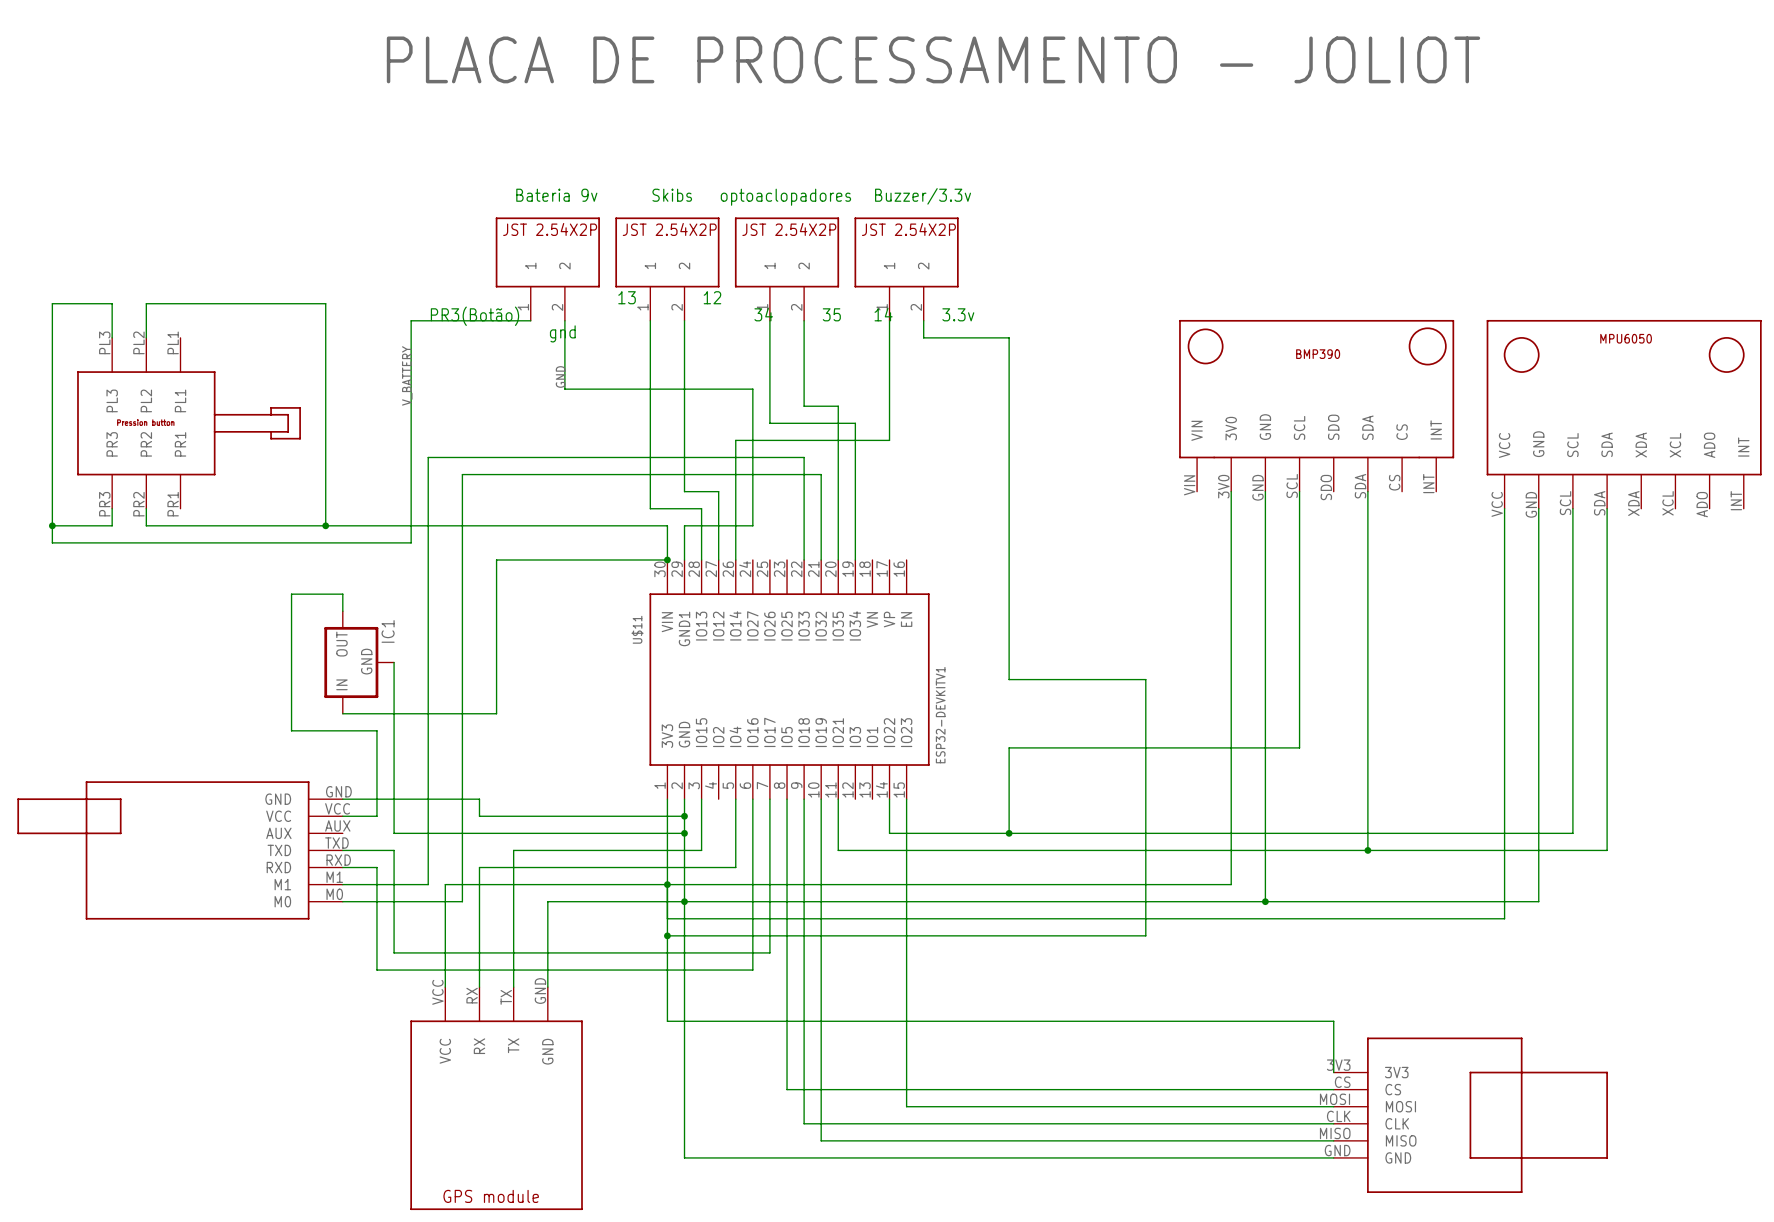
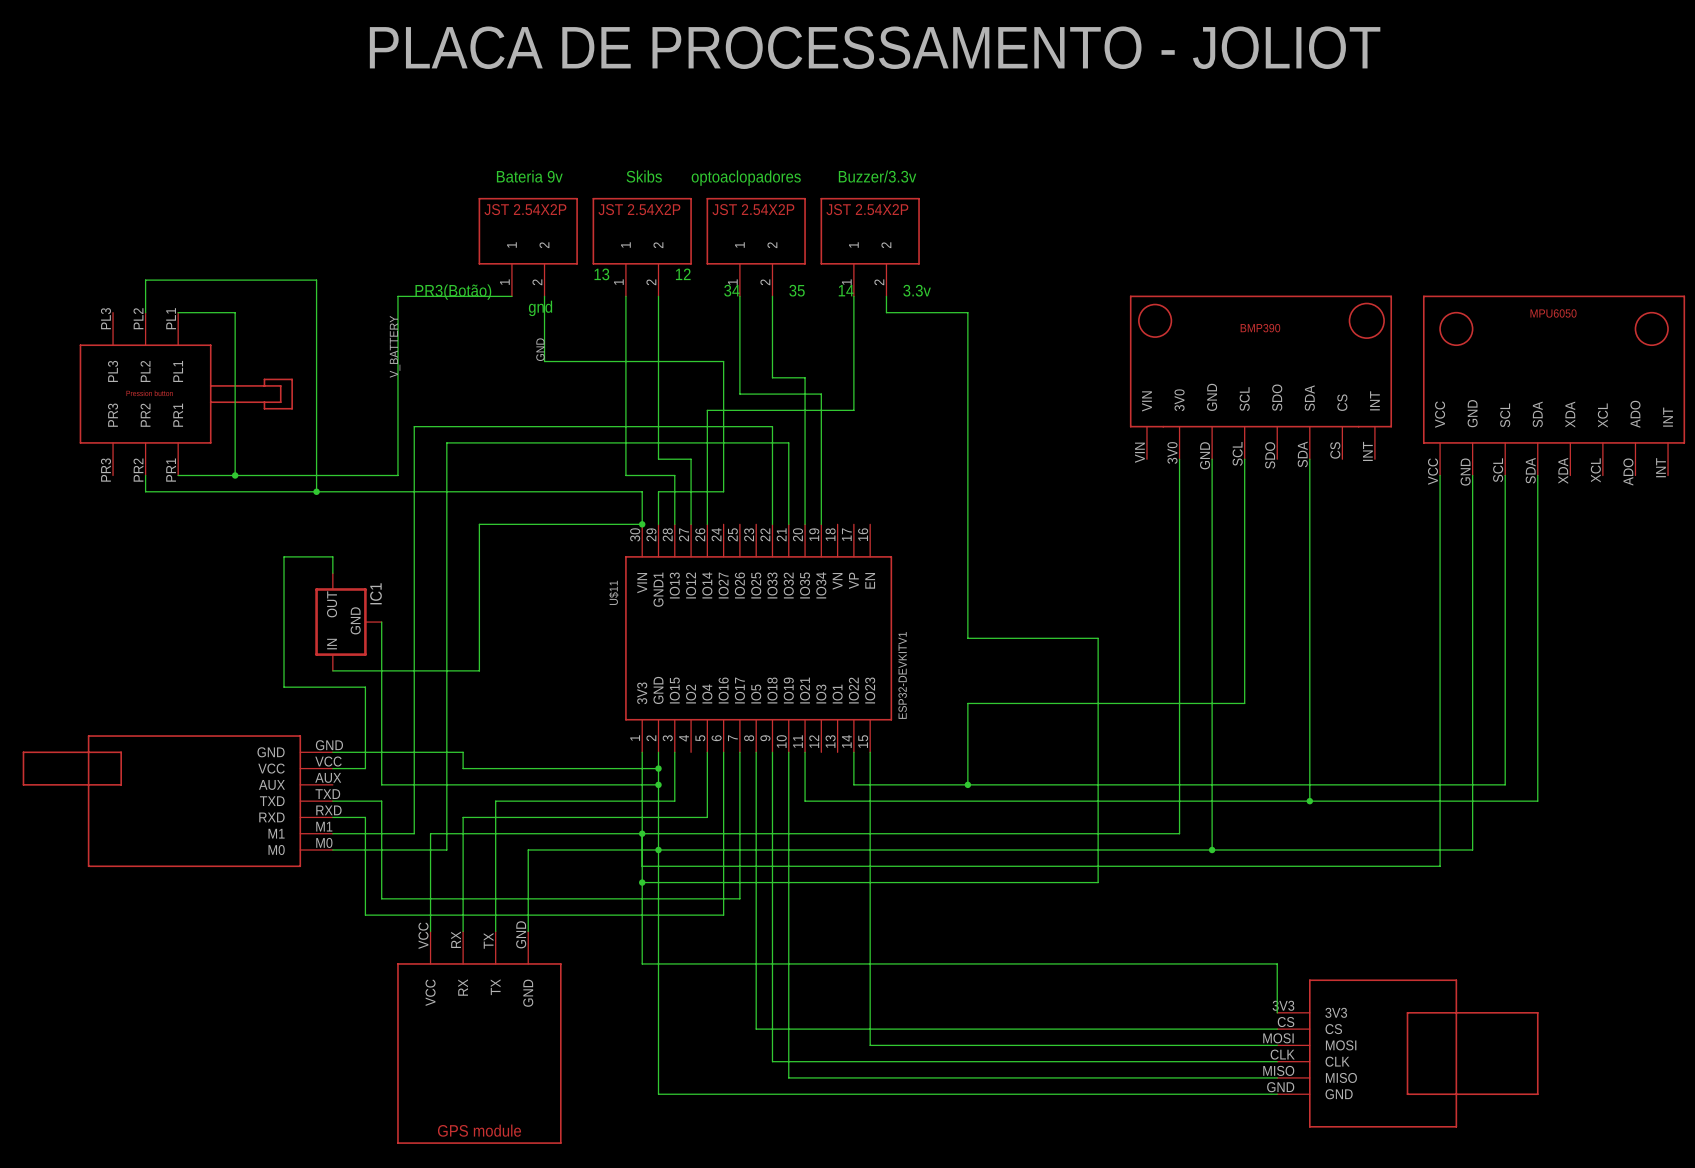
wire: (112, 337) (112, 303) (52, 303) (52, 542) (411, 542) (411, 508) -> (178, 475) (397, 475)
wire: none -> (178, 312) (235, 312) (235, 475)
wire: (112, 508) (112, 525) (52, 525) -> none
junction: none -> (235, 475)
junction: (52, 525) -> none

